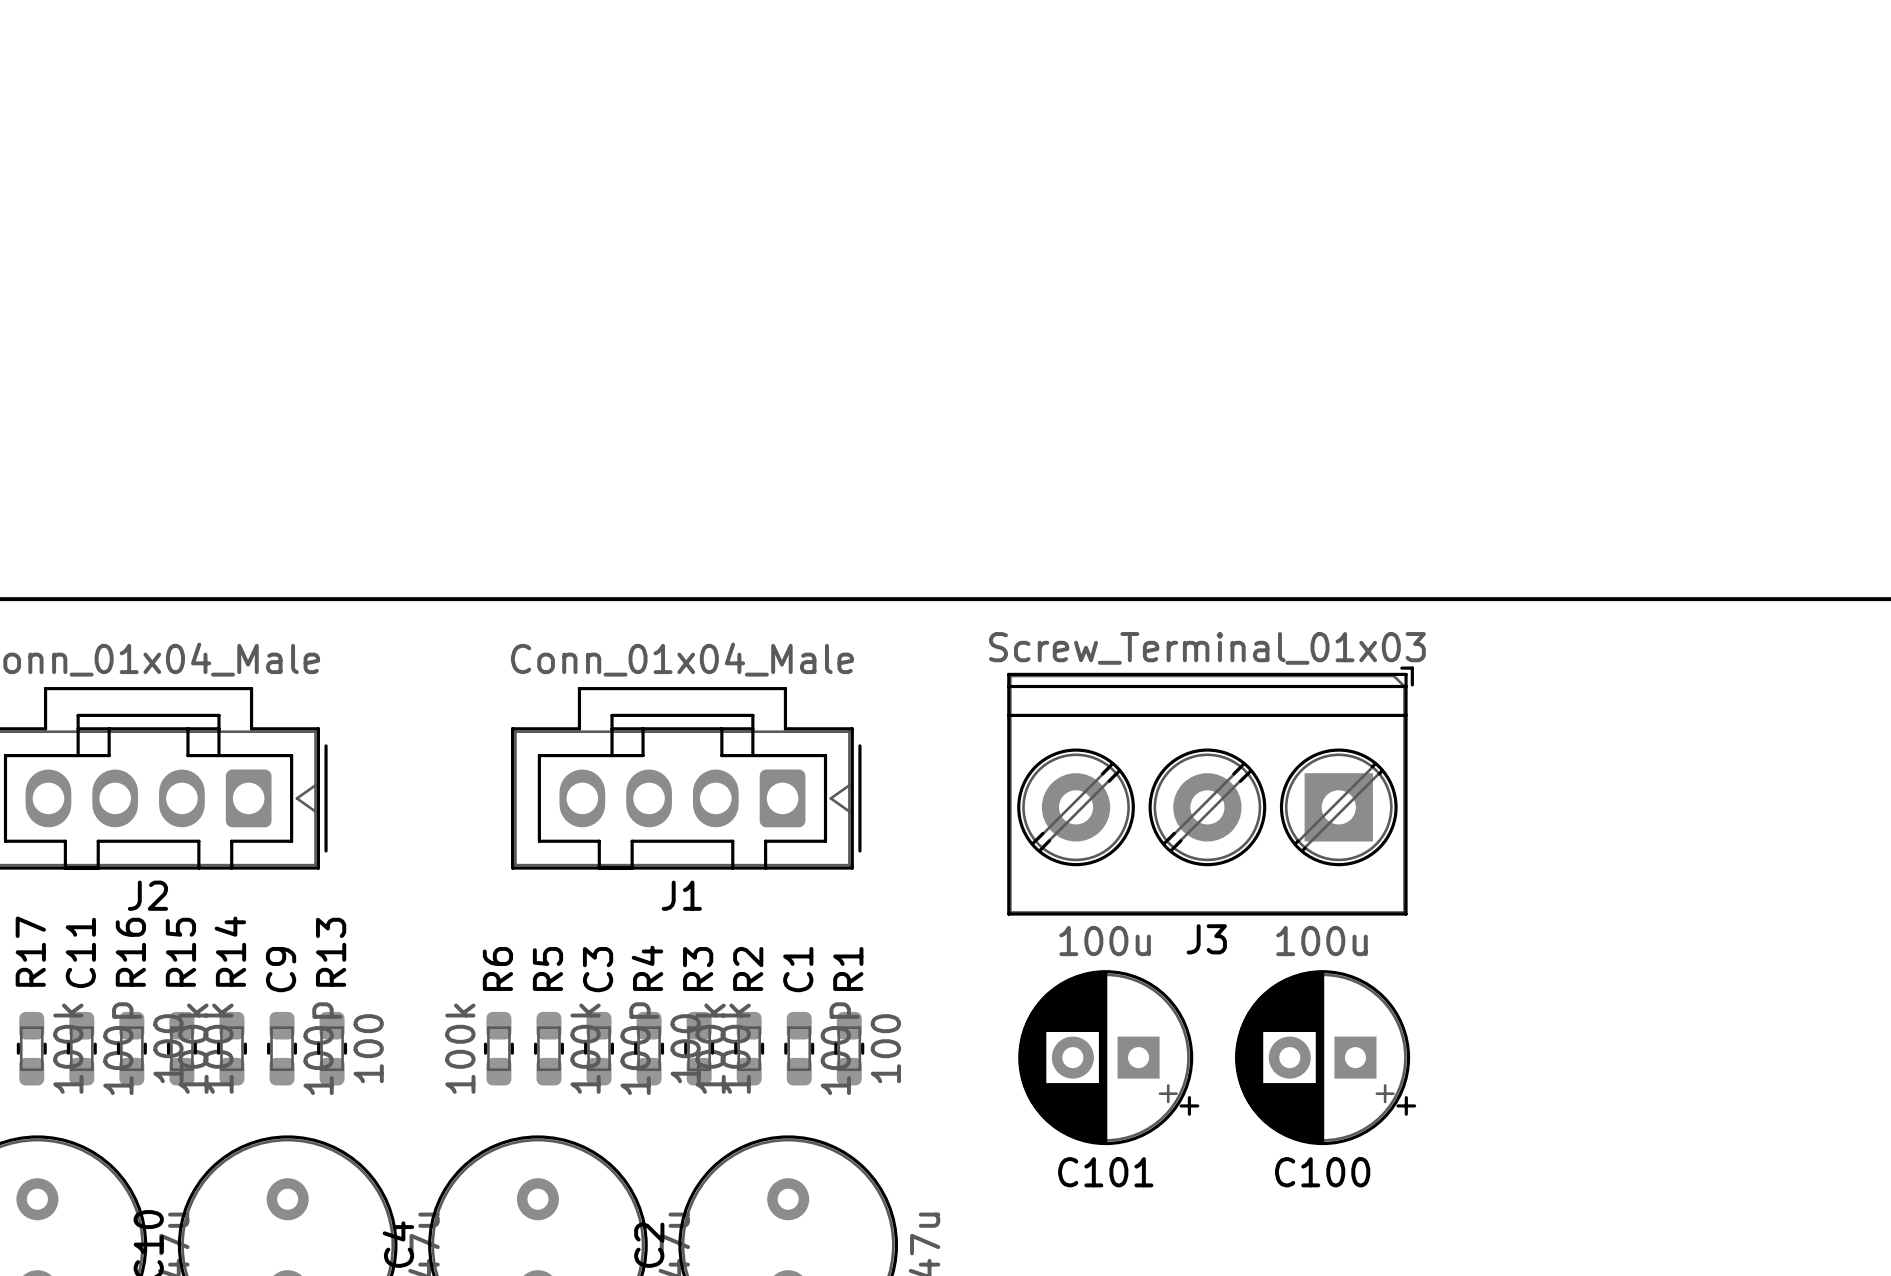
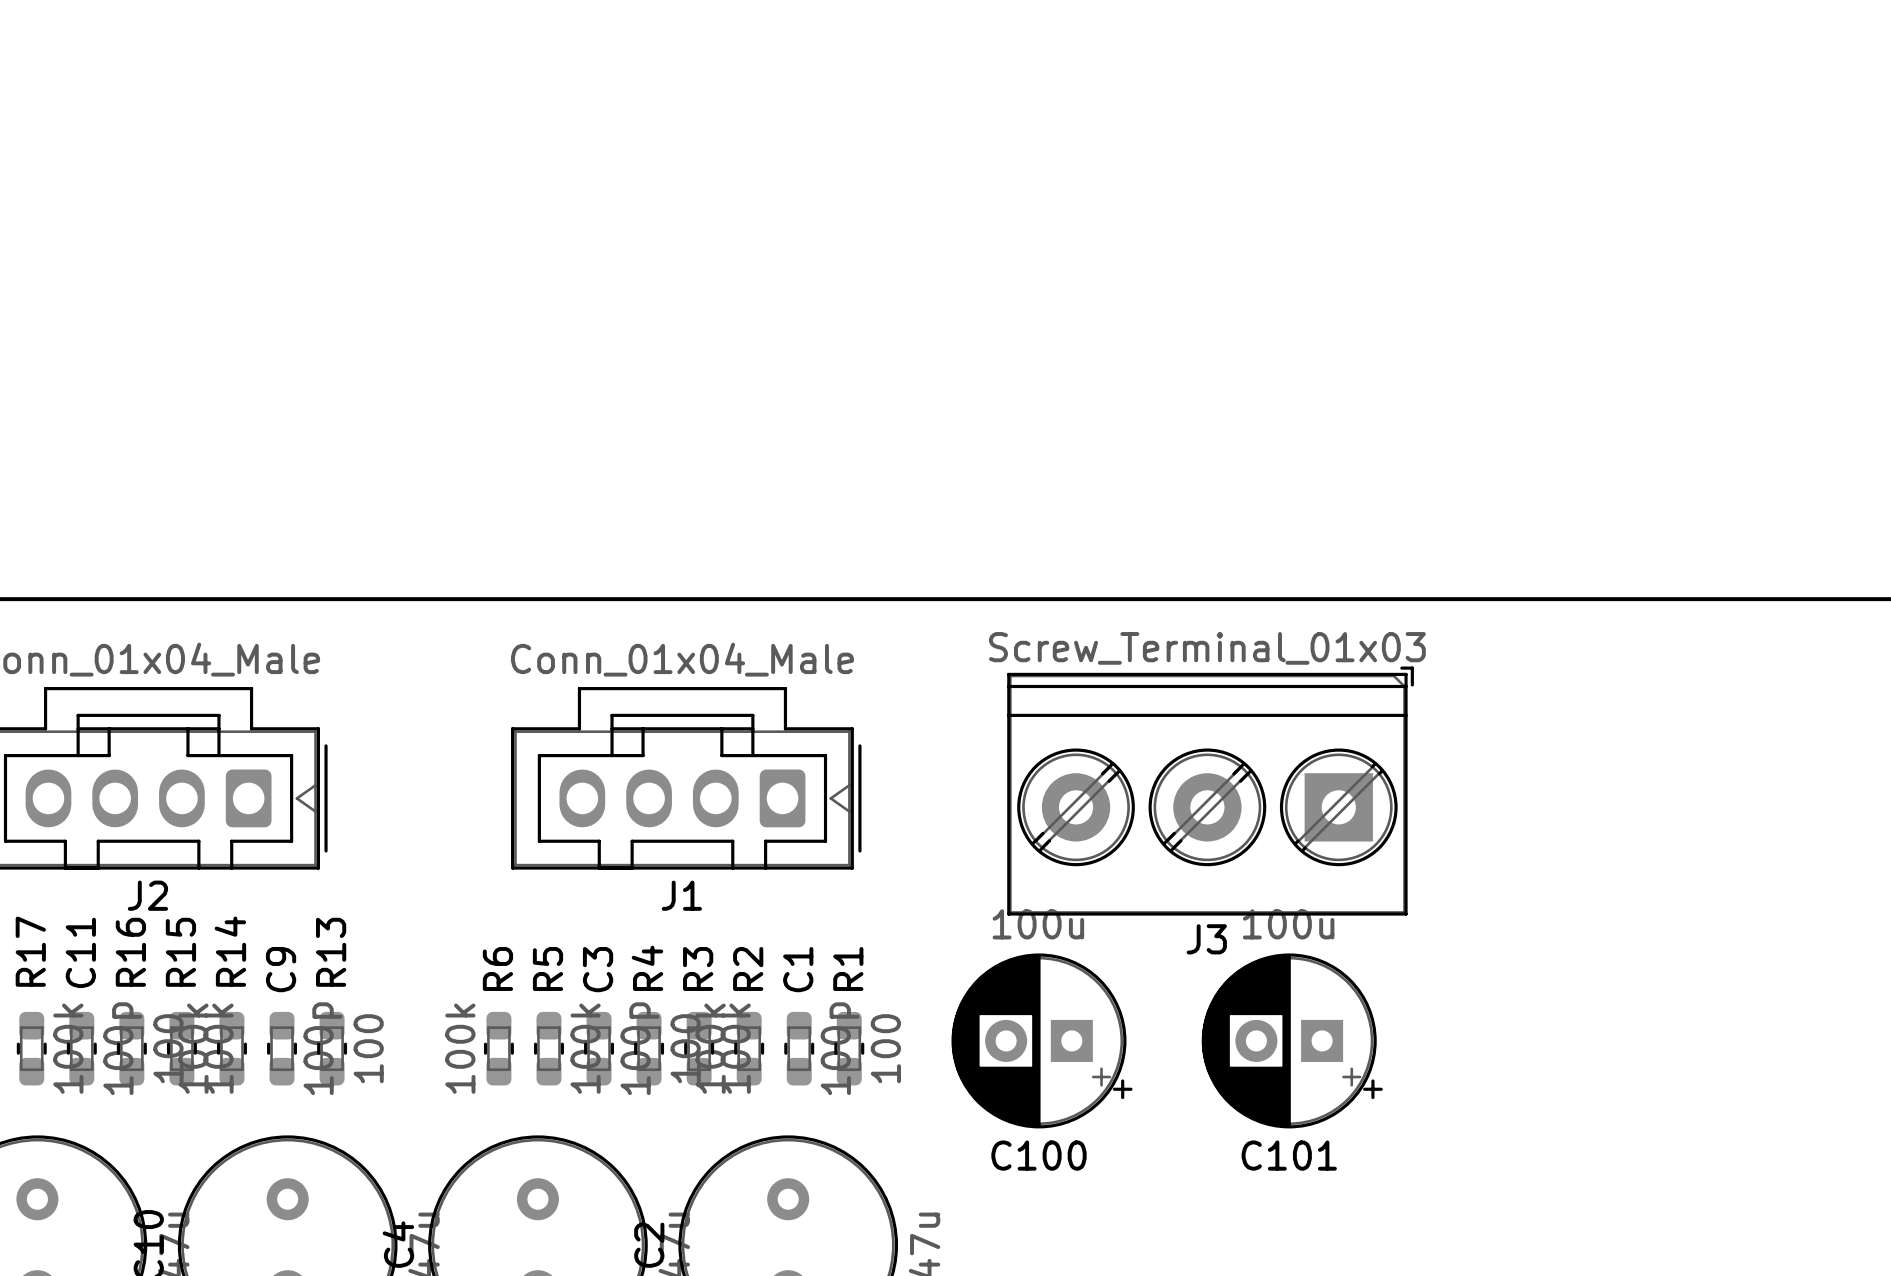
C101 position: (1108, 1057) -> (1292, 1040)
C100 position: (1325, 1057) -> (1042, 1040)

